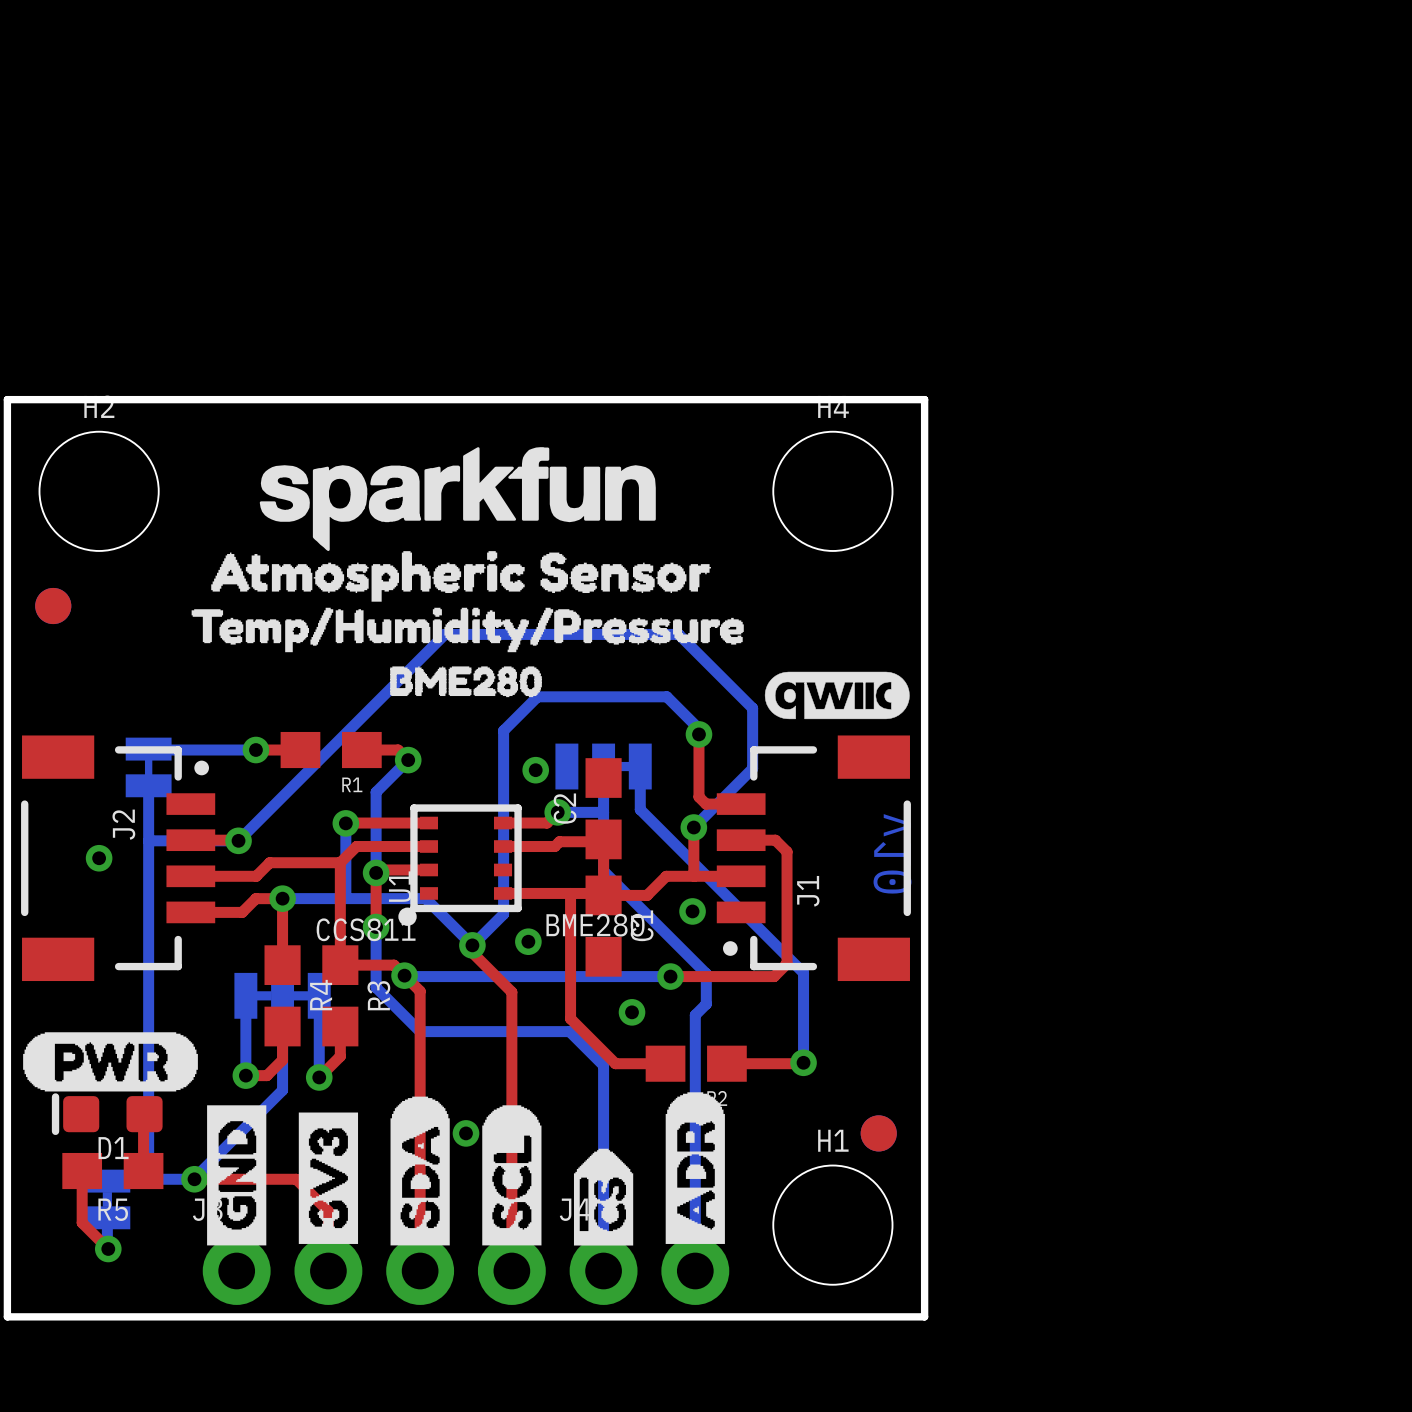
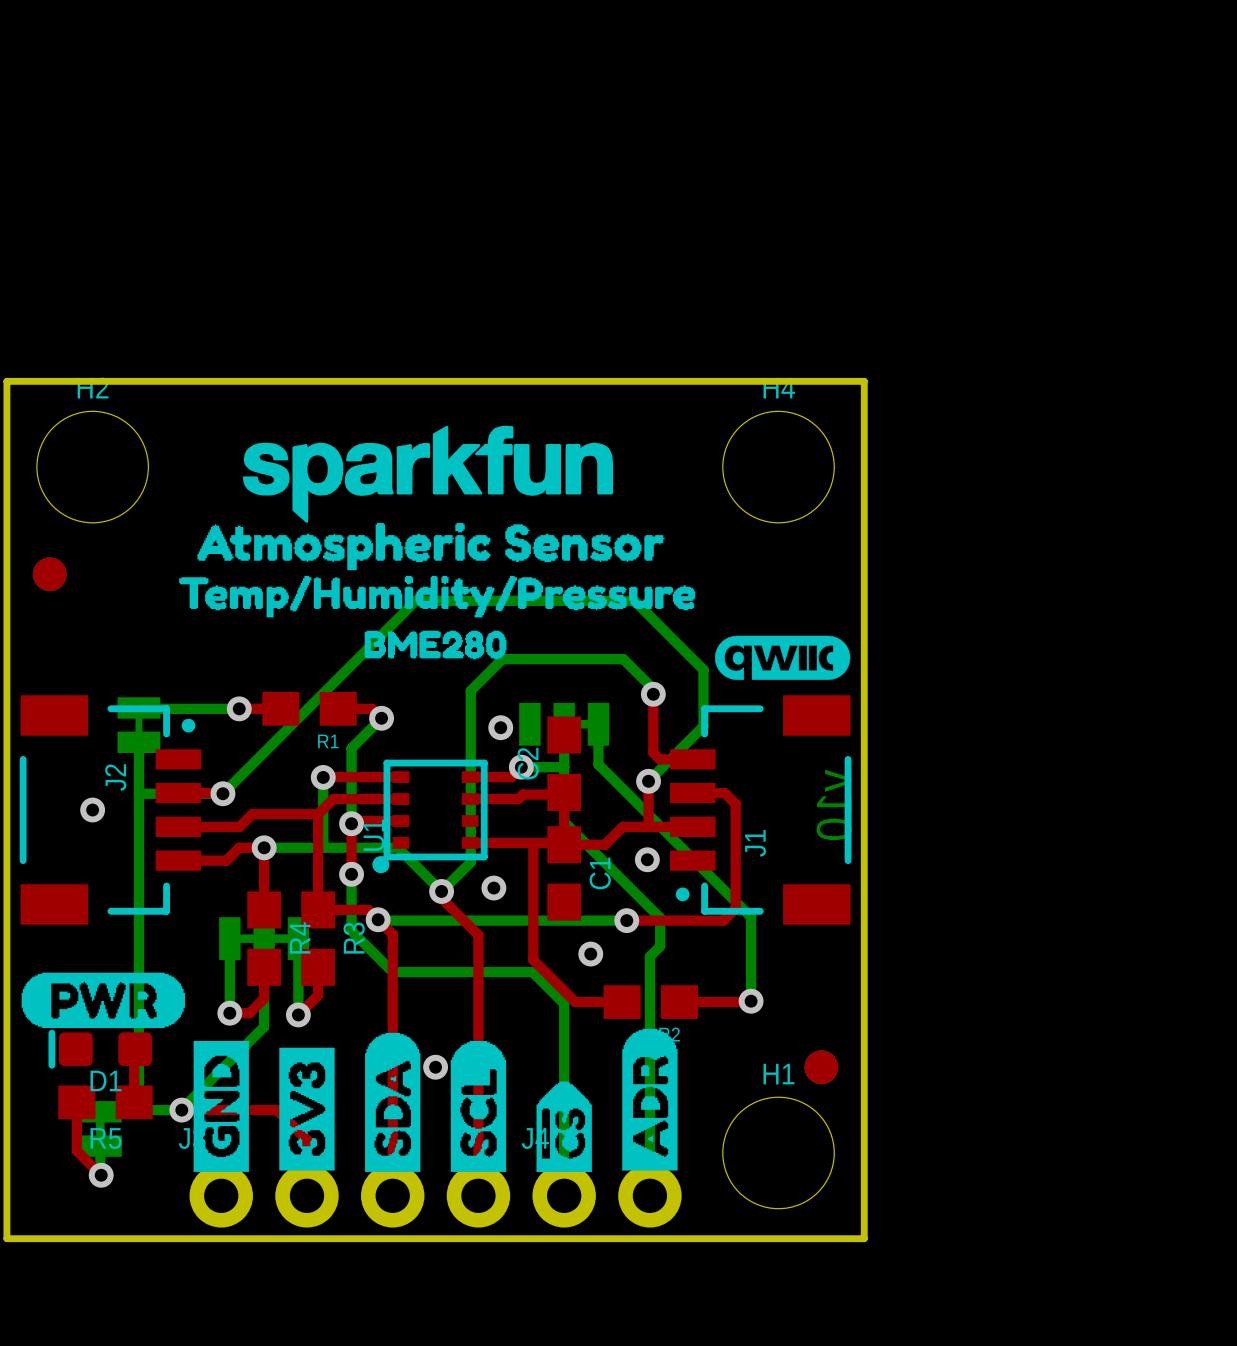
text: BME280 (595, 925) -> none
text: CCS811 (366, 929) -> none

